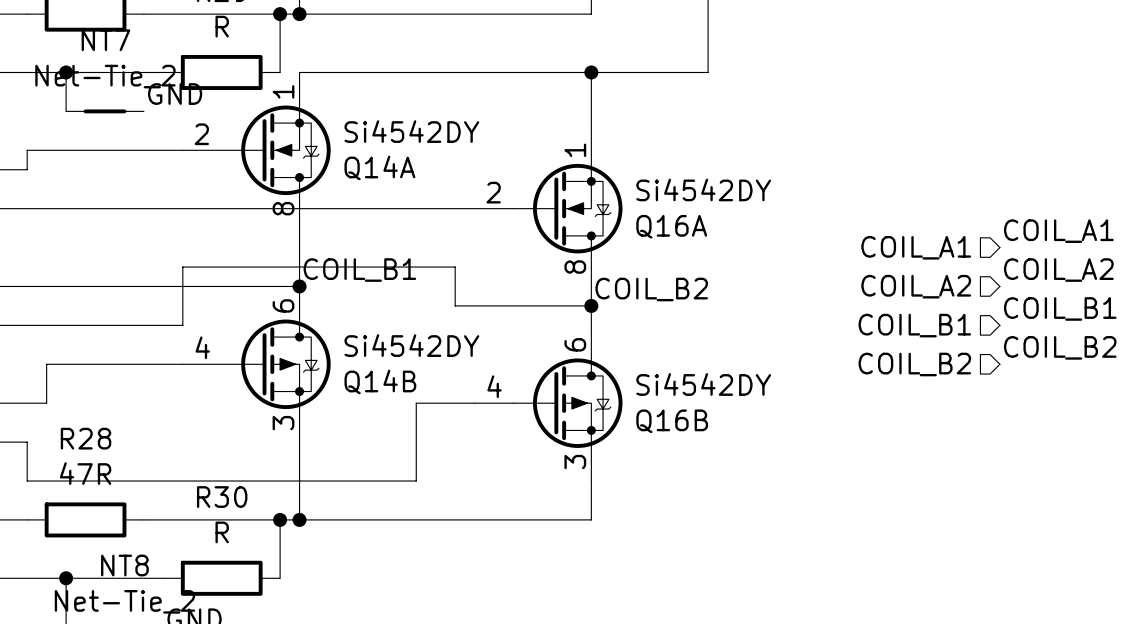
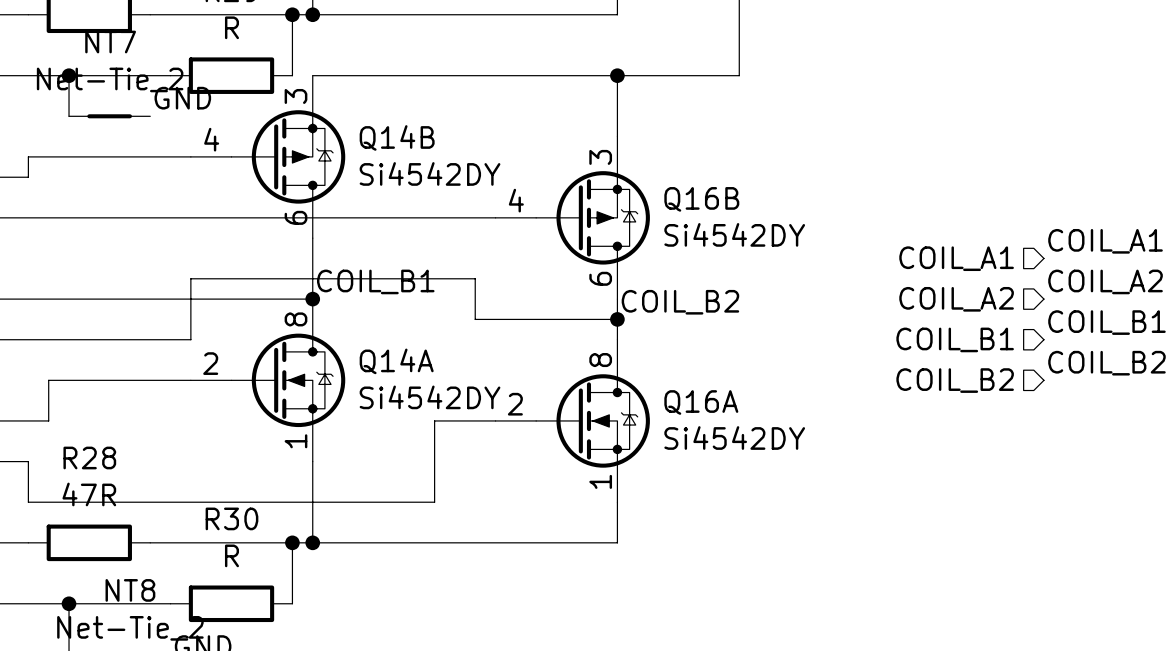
Q14A position: (256, 150) -> (268, 380)
Q14A flip: as is (276, 150) -> up-down (288, 380)
Q16A position: (548, 208) -> (572, 420)
Q16A flip: as is (568, 208) -> up-down (593, 420)
Q14B position: (256, 364) -> (268, 156)
Q14B flip: as is (276, 364) -> up-down (288, 156)
Q16B position: (548, 403) -> (572, 217)
Q16B flip: as is (568, 403) -> up-down (593, 217)

